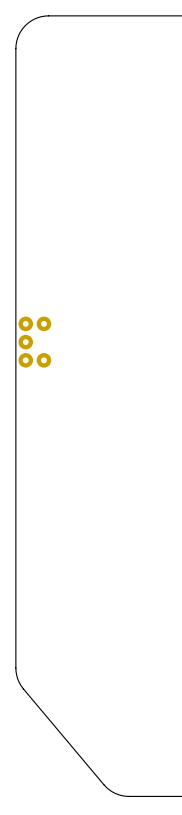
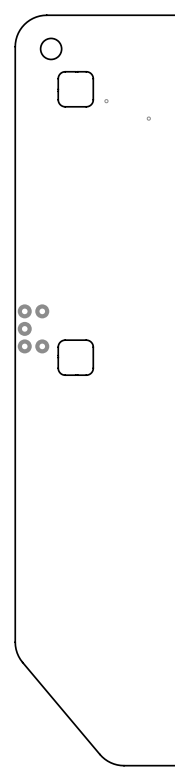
round board edge: none -> [40, 38, 63, 60]
board edge: none -> (75, 71) (60, 73) (58, 89)
board edge: none -> (75, 71) (87, 71) (92, 75) (93, 99) (91, 104) (86, 106) (62, 106) (58, 101) (58, 89)
via: none -> (106, 101)
via: none -> (148, 118)
board edge: none -> (58, 357) (58, 345) (62, 340) (86, 340) (91, 342) (93, 347) (92, 371) (87, 375) (75, 375)
board edge: none -> (58, 357) (60, 373) (75, 375)

